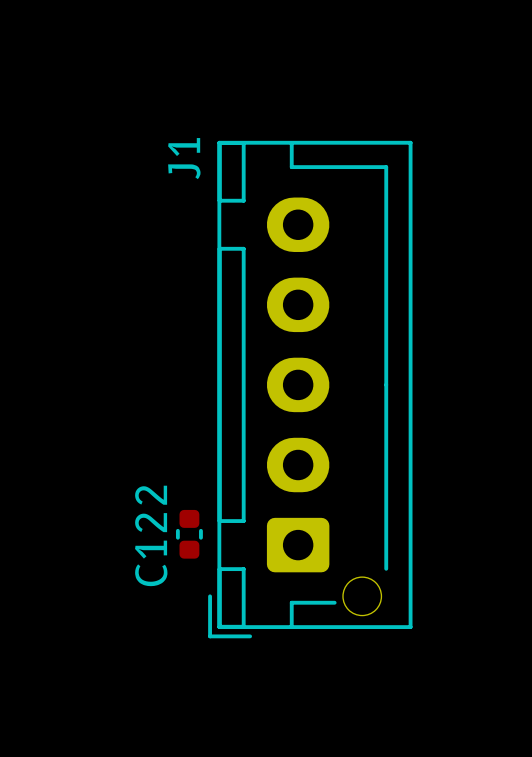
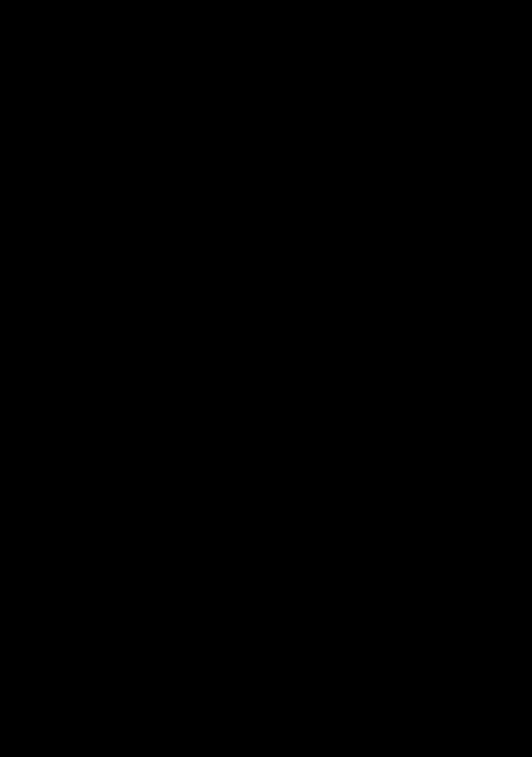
J1: (310, 389) -> none
C122: (189, 534) -> none

